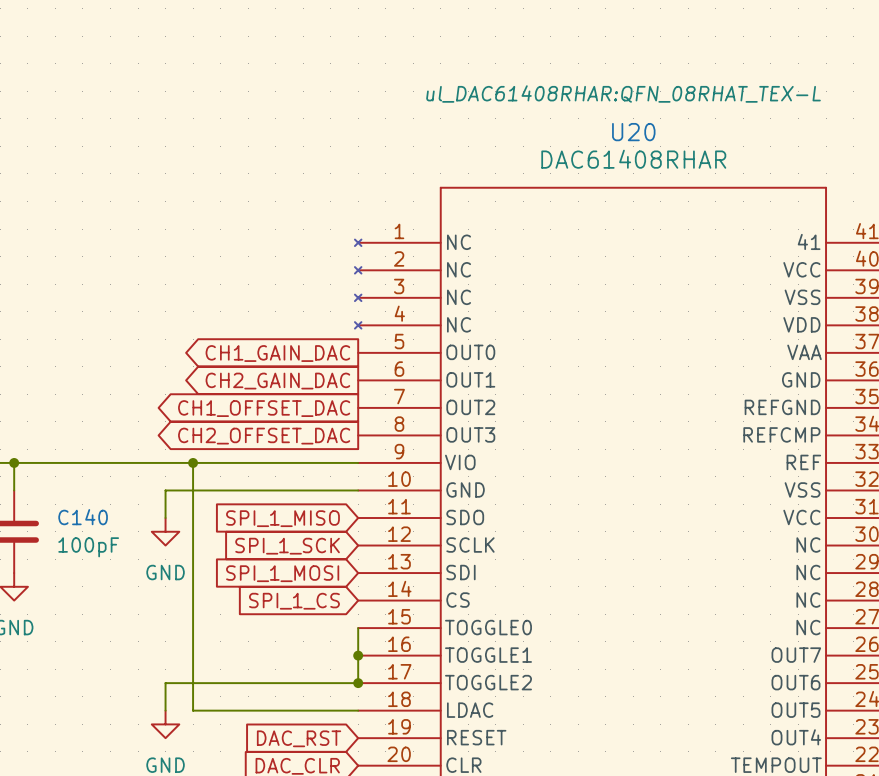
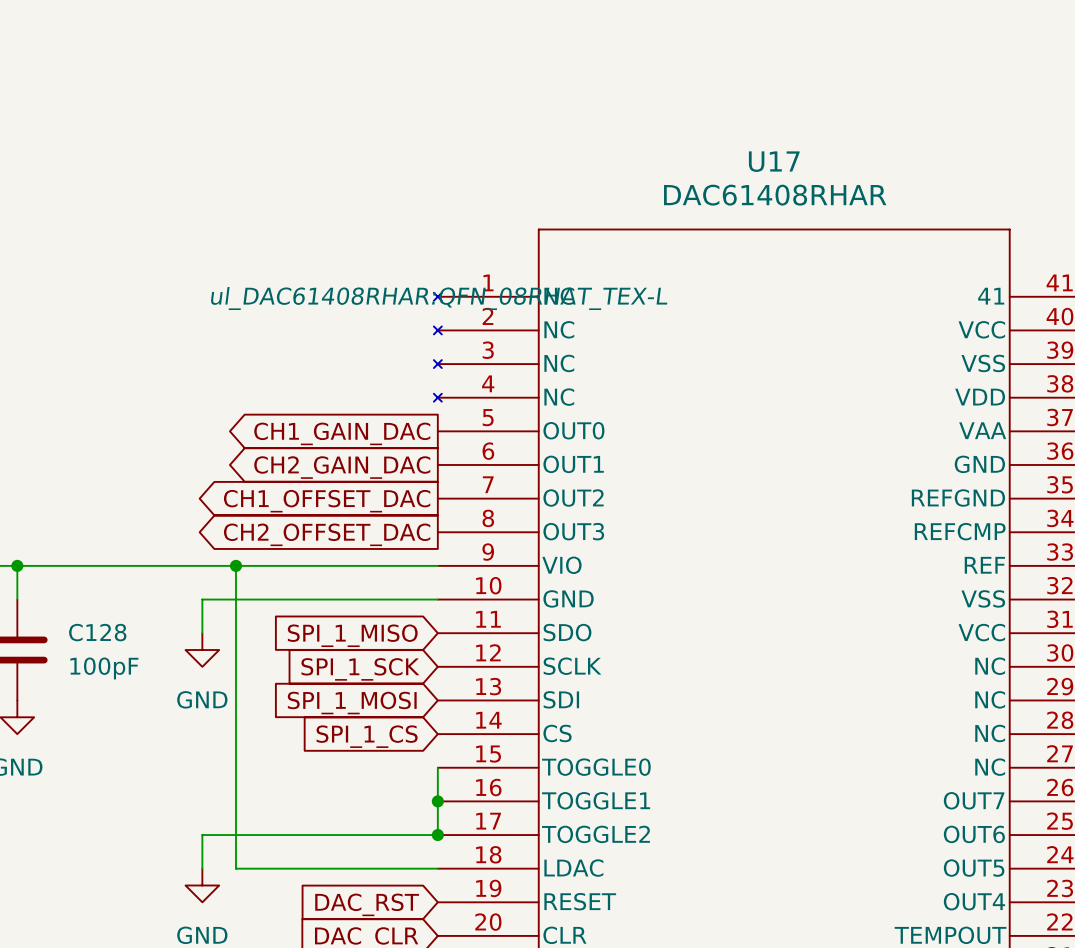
U20 text position: ul_DAC61408RHAR:QFN_08RHAT_TEX-L (623, 94) -> ul_DAC61408RHAR:QFN_08RHAT_TEX-L (439, 298)
U20 name: U20 (633, 132) -> U17 (774, 161)
C140 name: C140 (83, 517) -> C128 (97, 632)

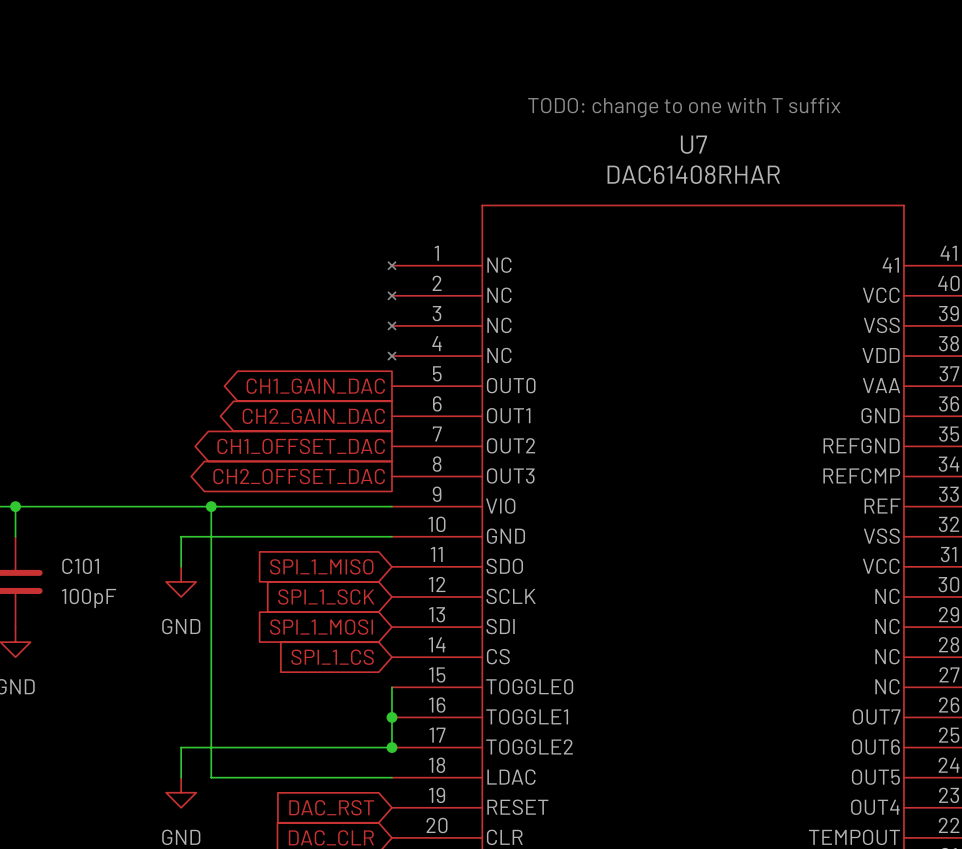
text: none -> TODO: change to one with T suffix (684, 107)
U17 name: U17 (774, 161) -> U7 (693, 144)
U17 text: ul_DAC61408RHAR:QFN_08RHAT_TEX-L (439, 298) -> none
C128 name: C128 (97, 632) -> C101 (80, 566)

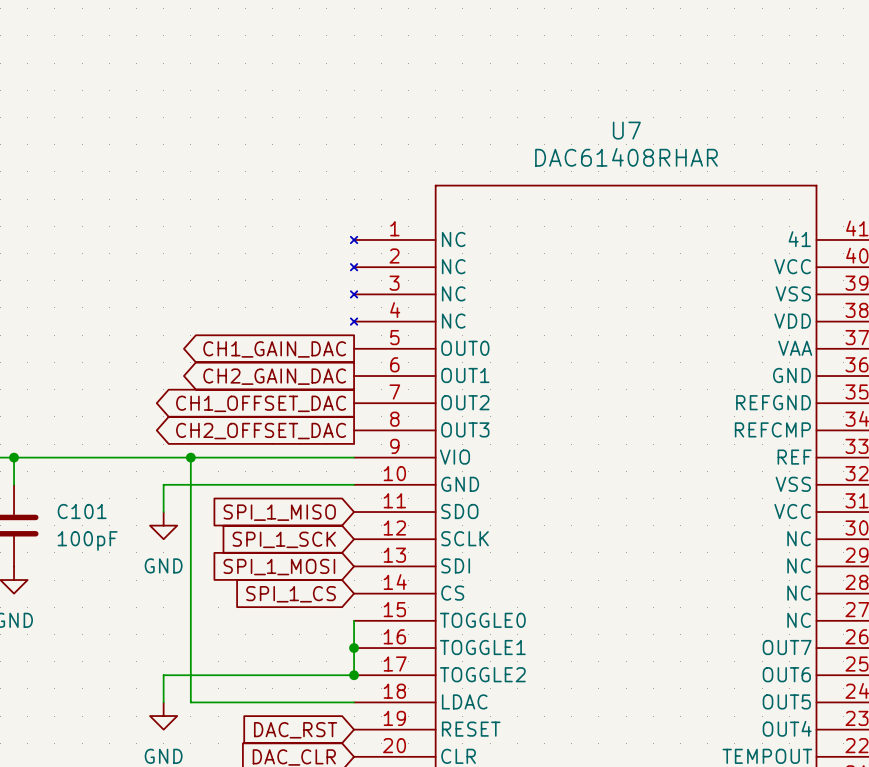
text: TODO: change to one with T suffix (684, 107) -> none

